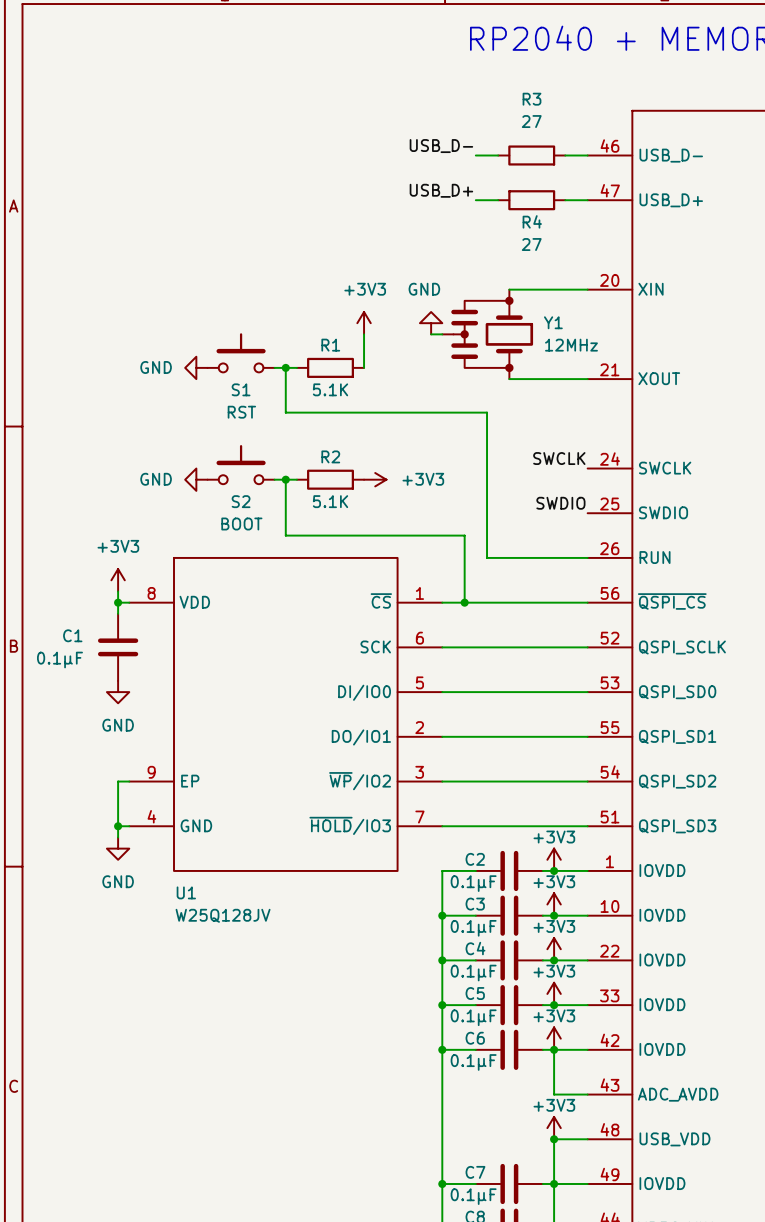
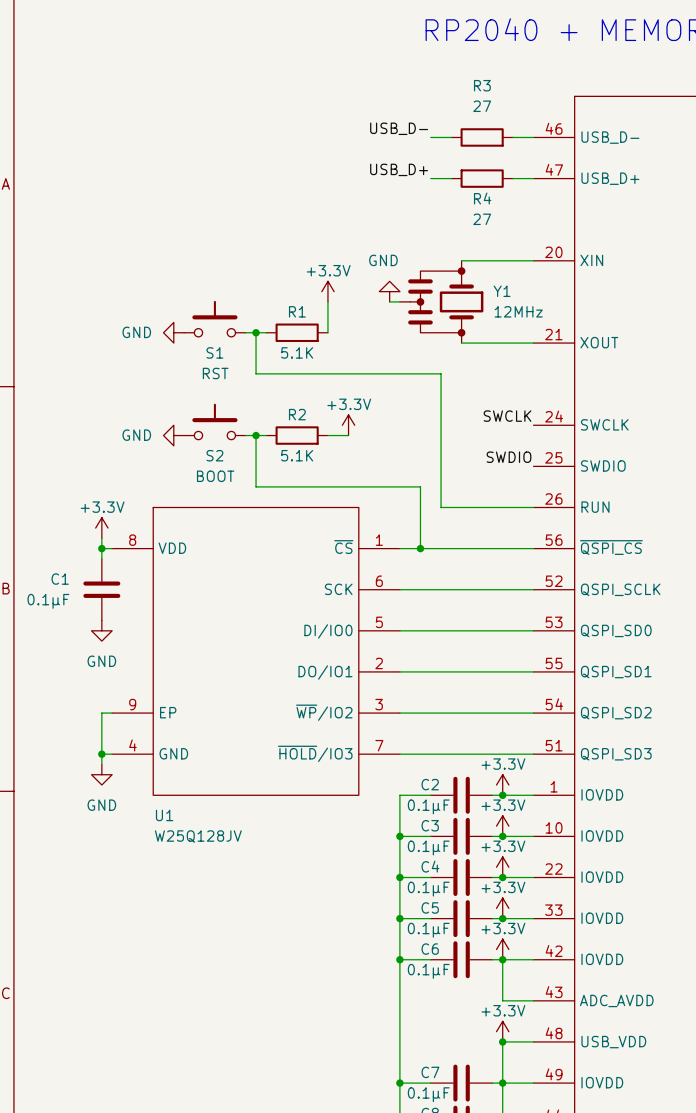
power symbol: +3V3 (364, 323) -> +3.3V (327, 291)
power symbol: none -> +3.3V (348, 425)
power symbol: +3V3 (375, 479) -> none
power symbol: +3V3 (118, 580) -> +3.3V (101, 528)
power symbol: +3V3 (554, 859) -> +3.3V (502, 785)
power symbol: +3V3 (554, 904) -> +3.3V (502, 826)
power symbol: +3V3 (554, 949) -> +3.3V (502, 867)
power symbol: +3V3 (554, 993) -> +3.3V (502, 908)
power symbol: +3V3 (554, 1038) -> +3.3V (502, 949)
power symbol: +3V3 (554, 1128) -> +3.3V (502, 1031)

